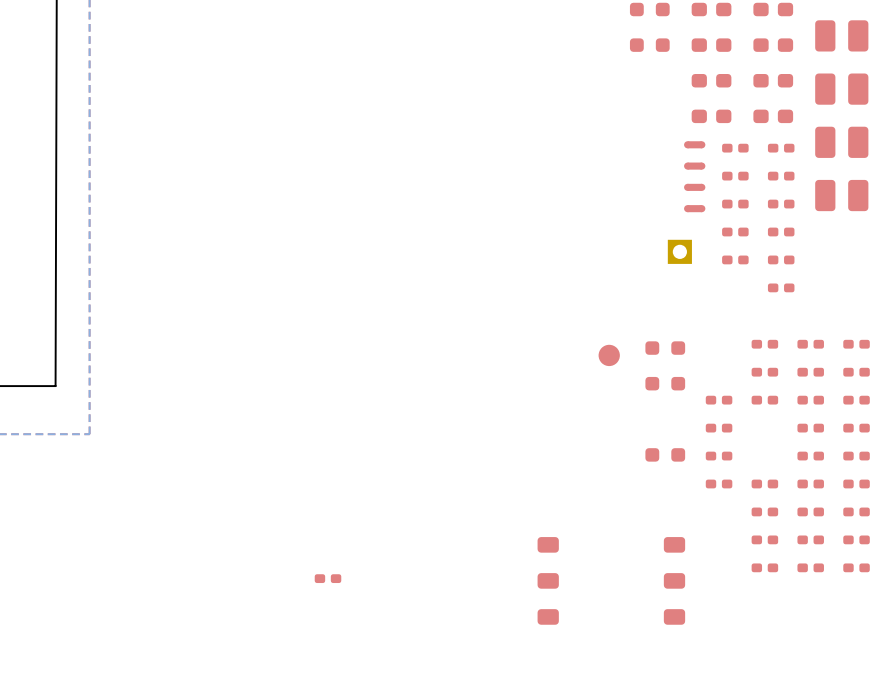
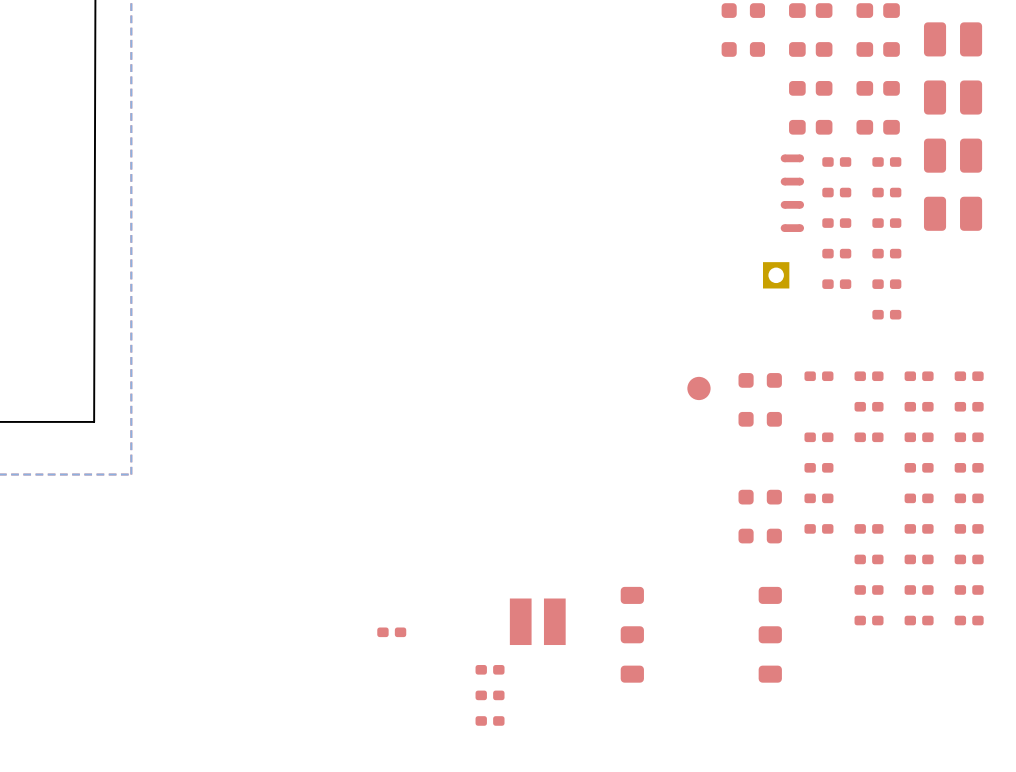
part: none -> (818, 376)
part: none -> (760, 536)
part: none -> (537, 621)
part: none -> (490, 669)
part: none -> (490, 695)
part: none -> (490, 720)

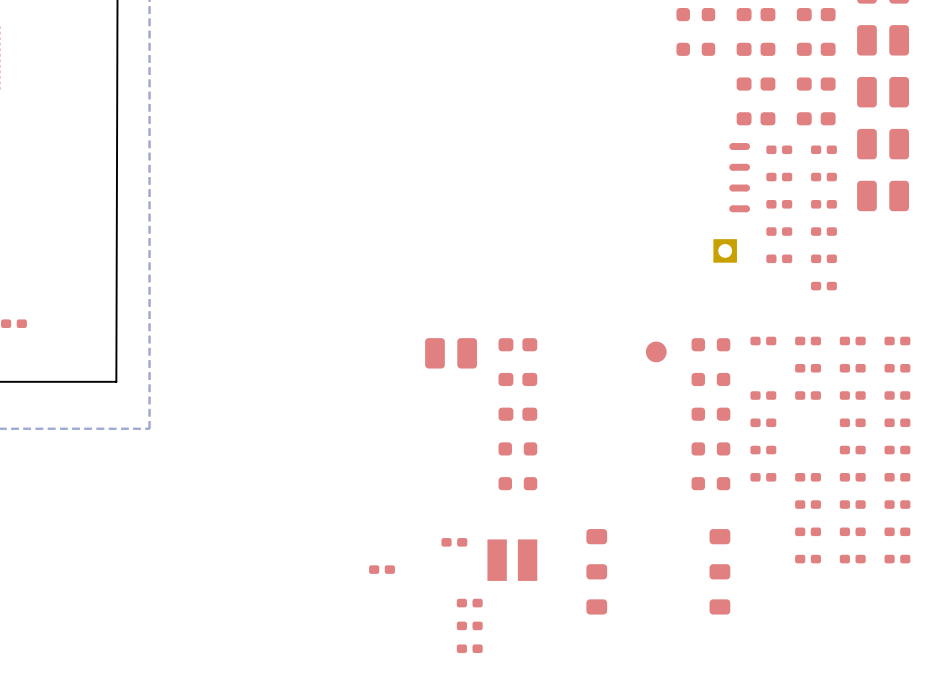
part: none -> (517, 344)
part: none -> (451, 353)
part: none -> (517, 379)
part: none -> (517, 414)
part: none -> (710, 414)
part: none -> (517, 448)
part: none -> (517, 483)
part: none -> (454, 542)

